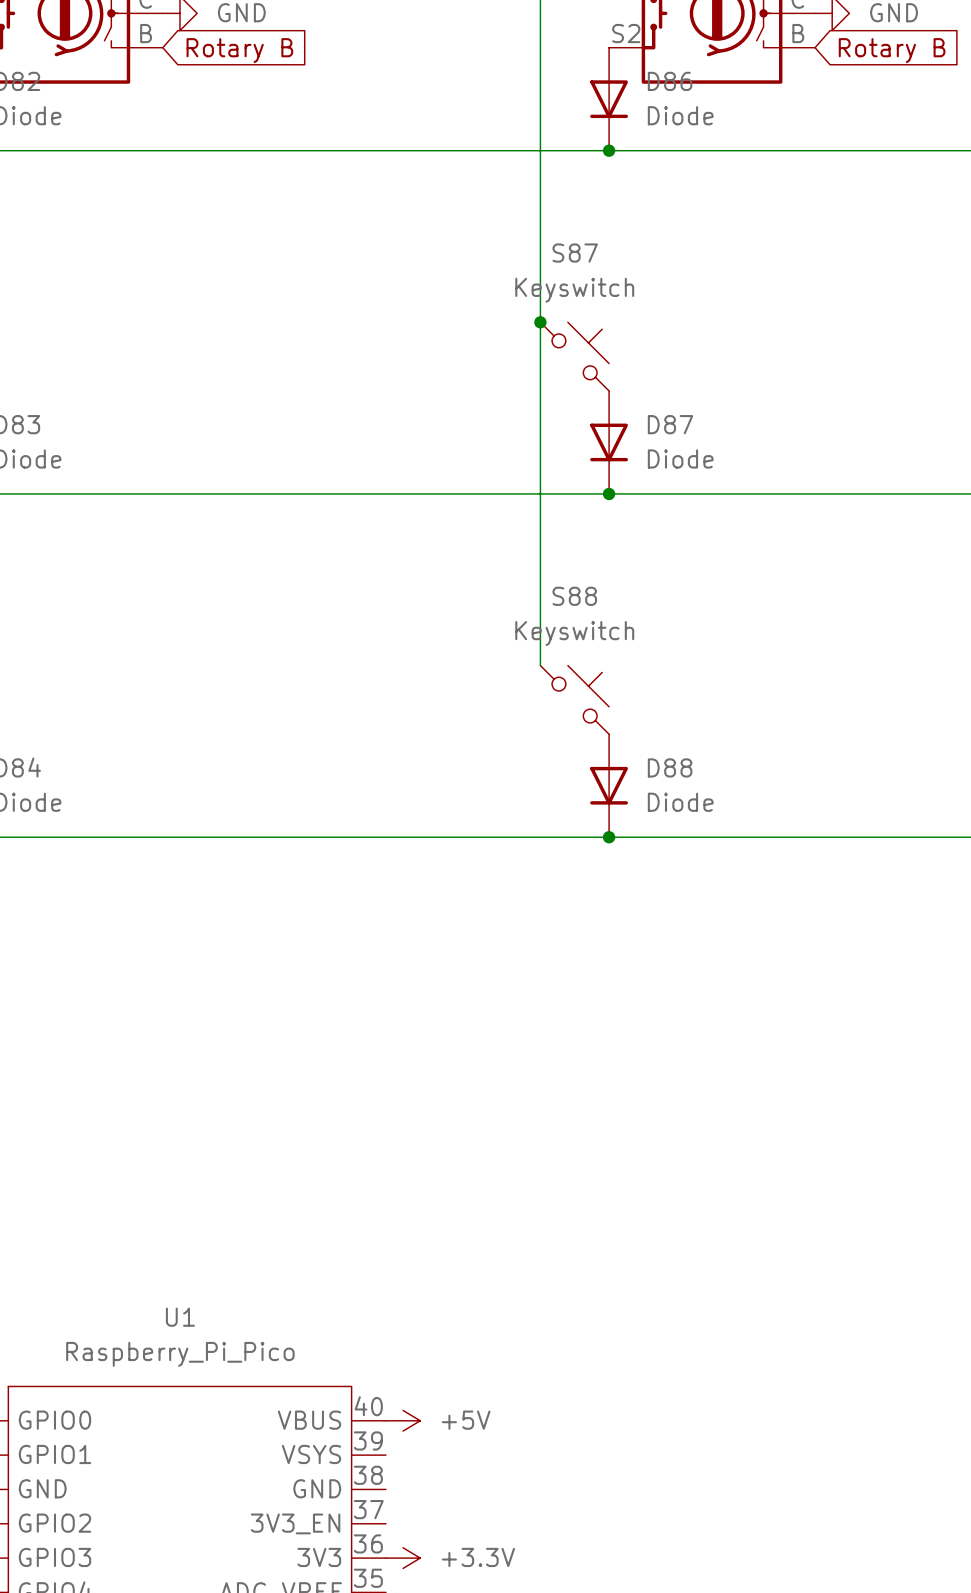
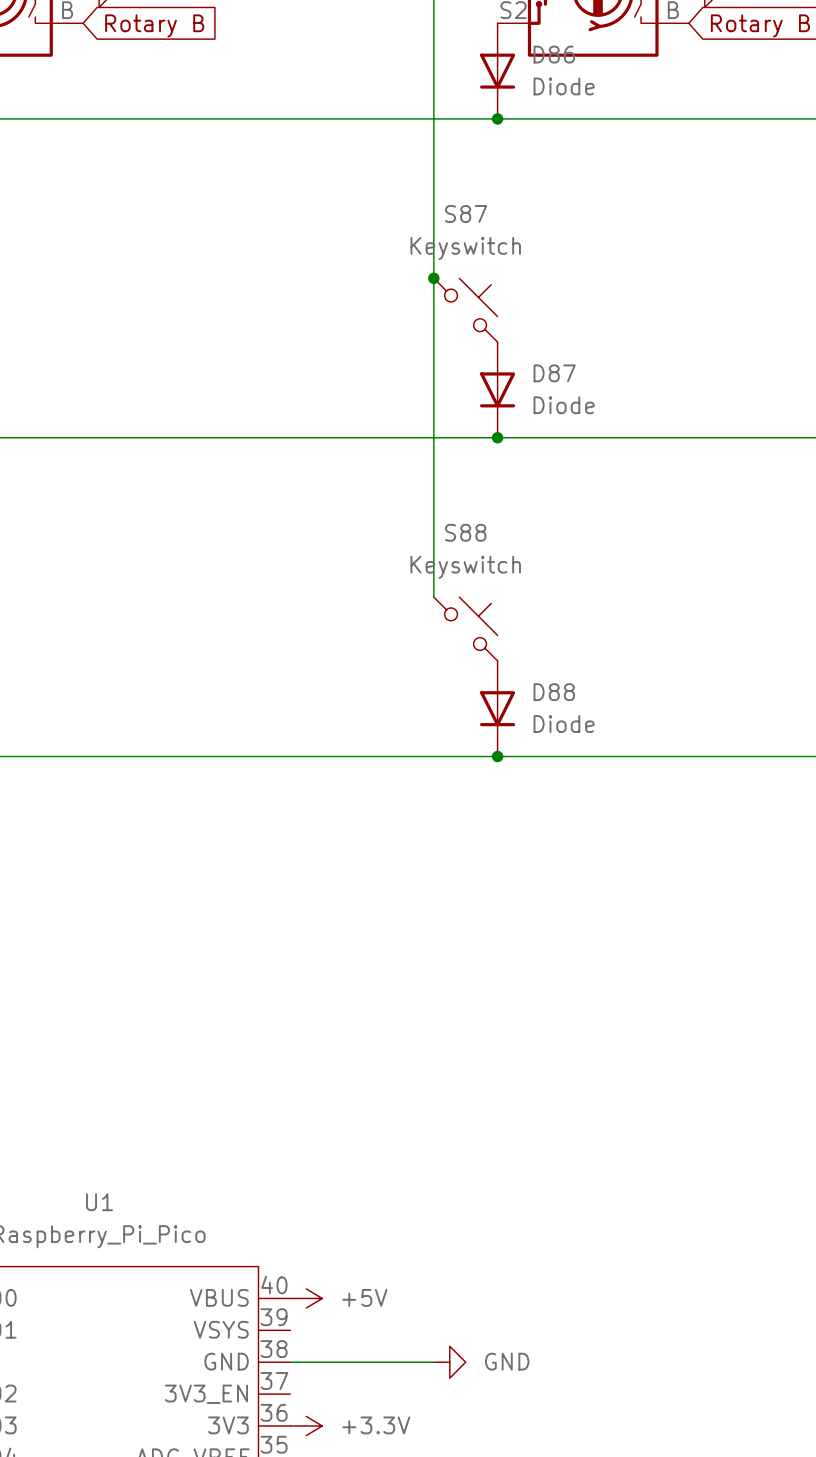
wire: none -> (290, 1362) (433, 1362)
power symbol: none -> GND (449, 1362)

